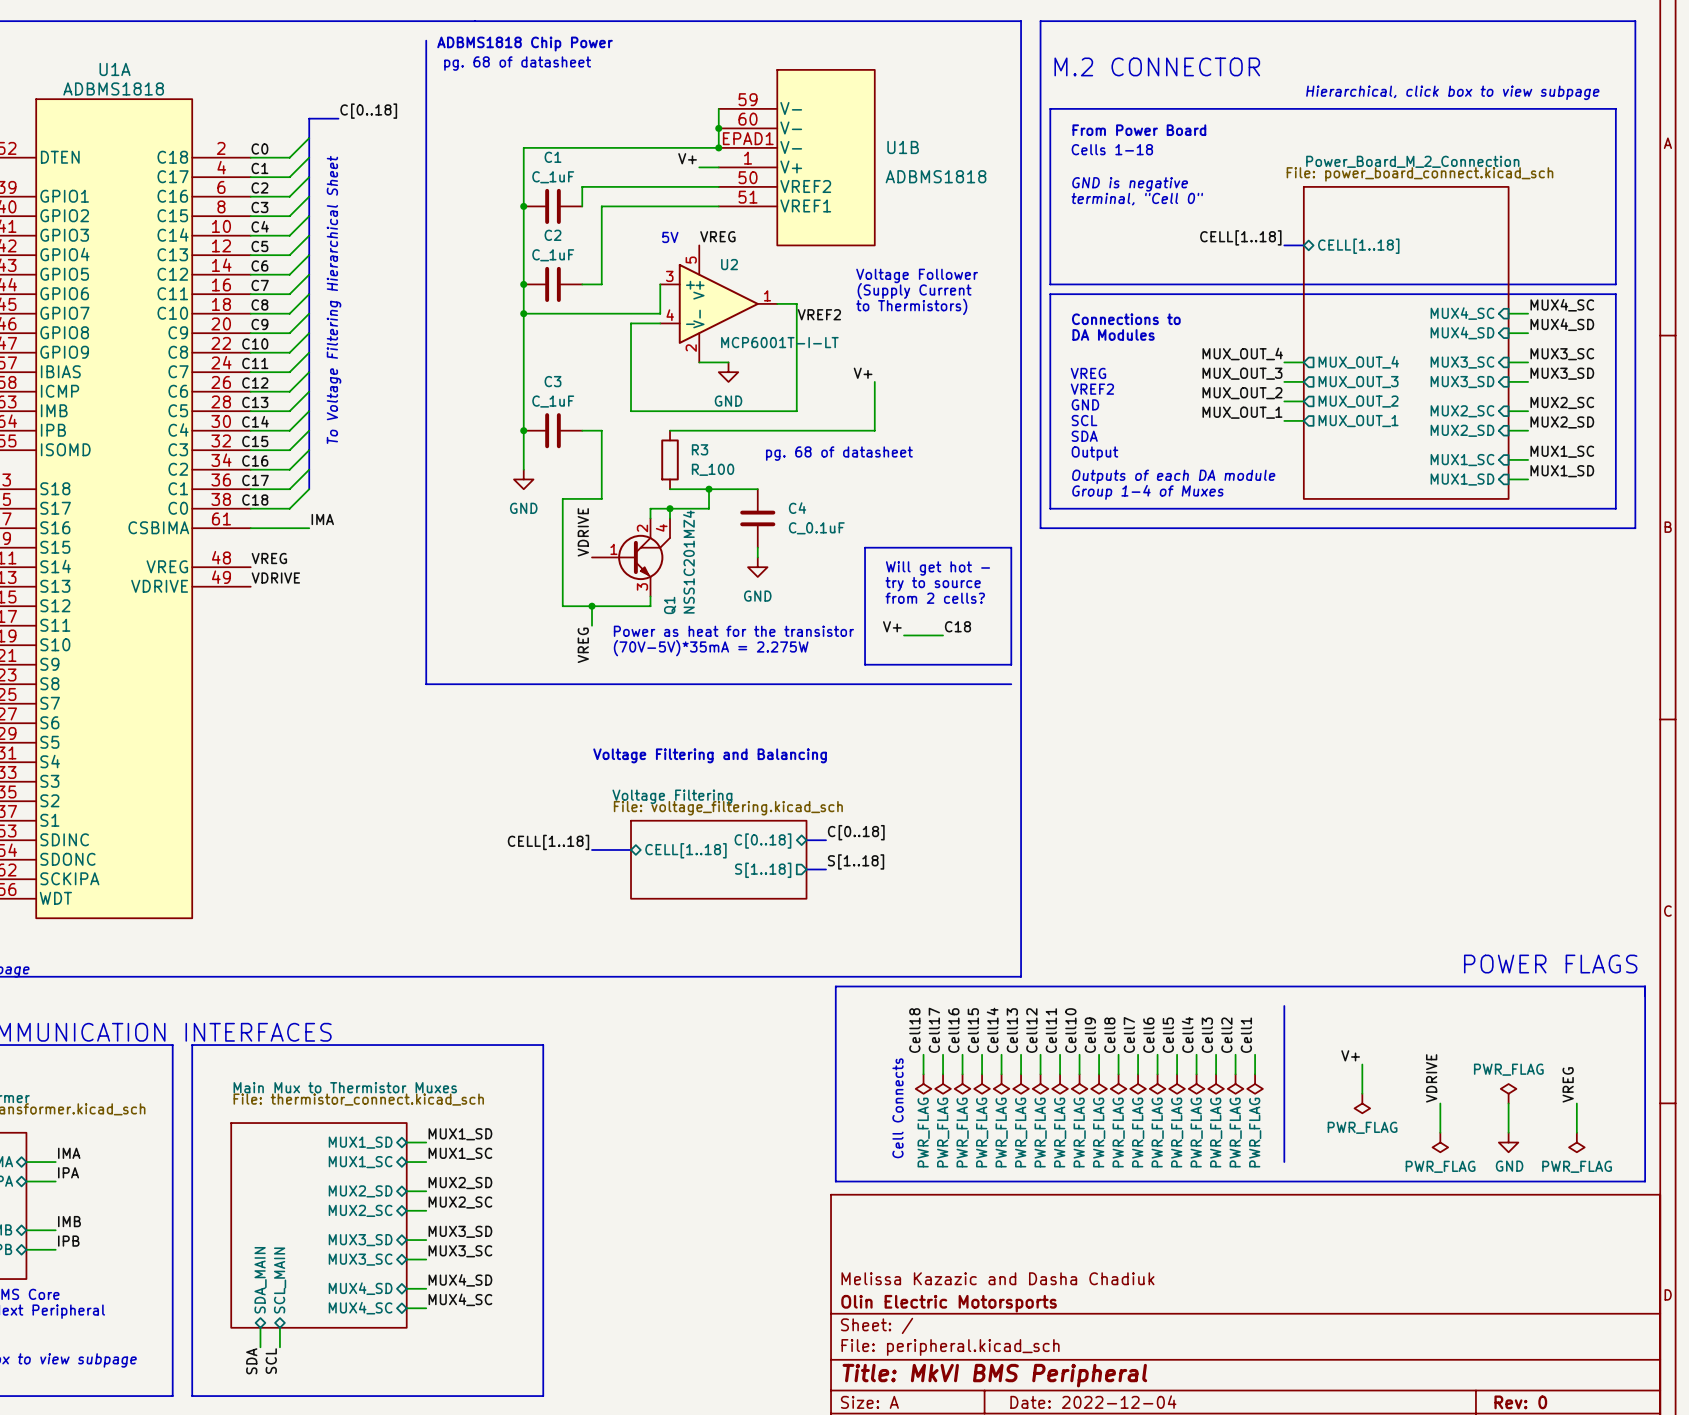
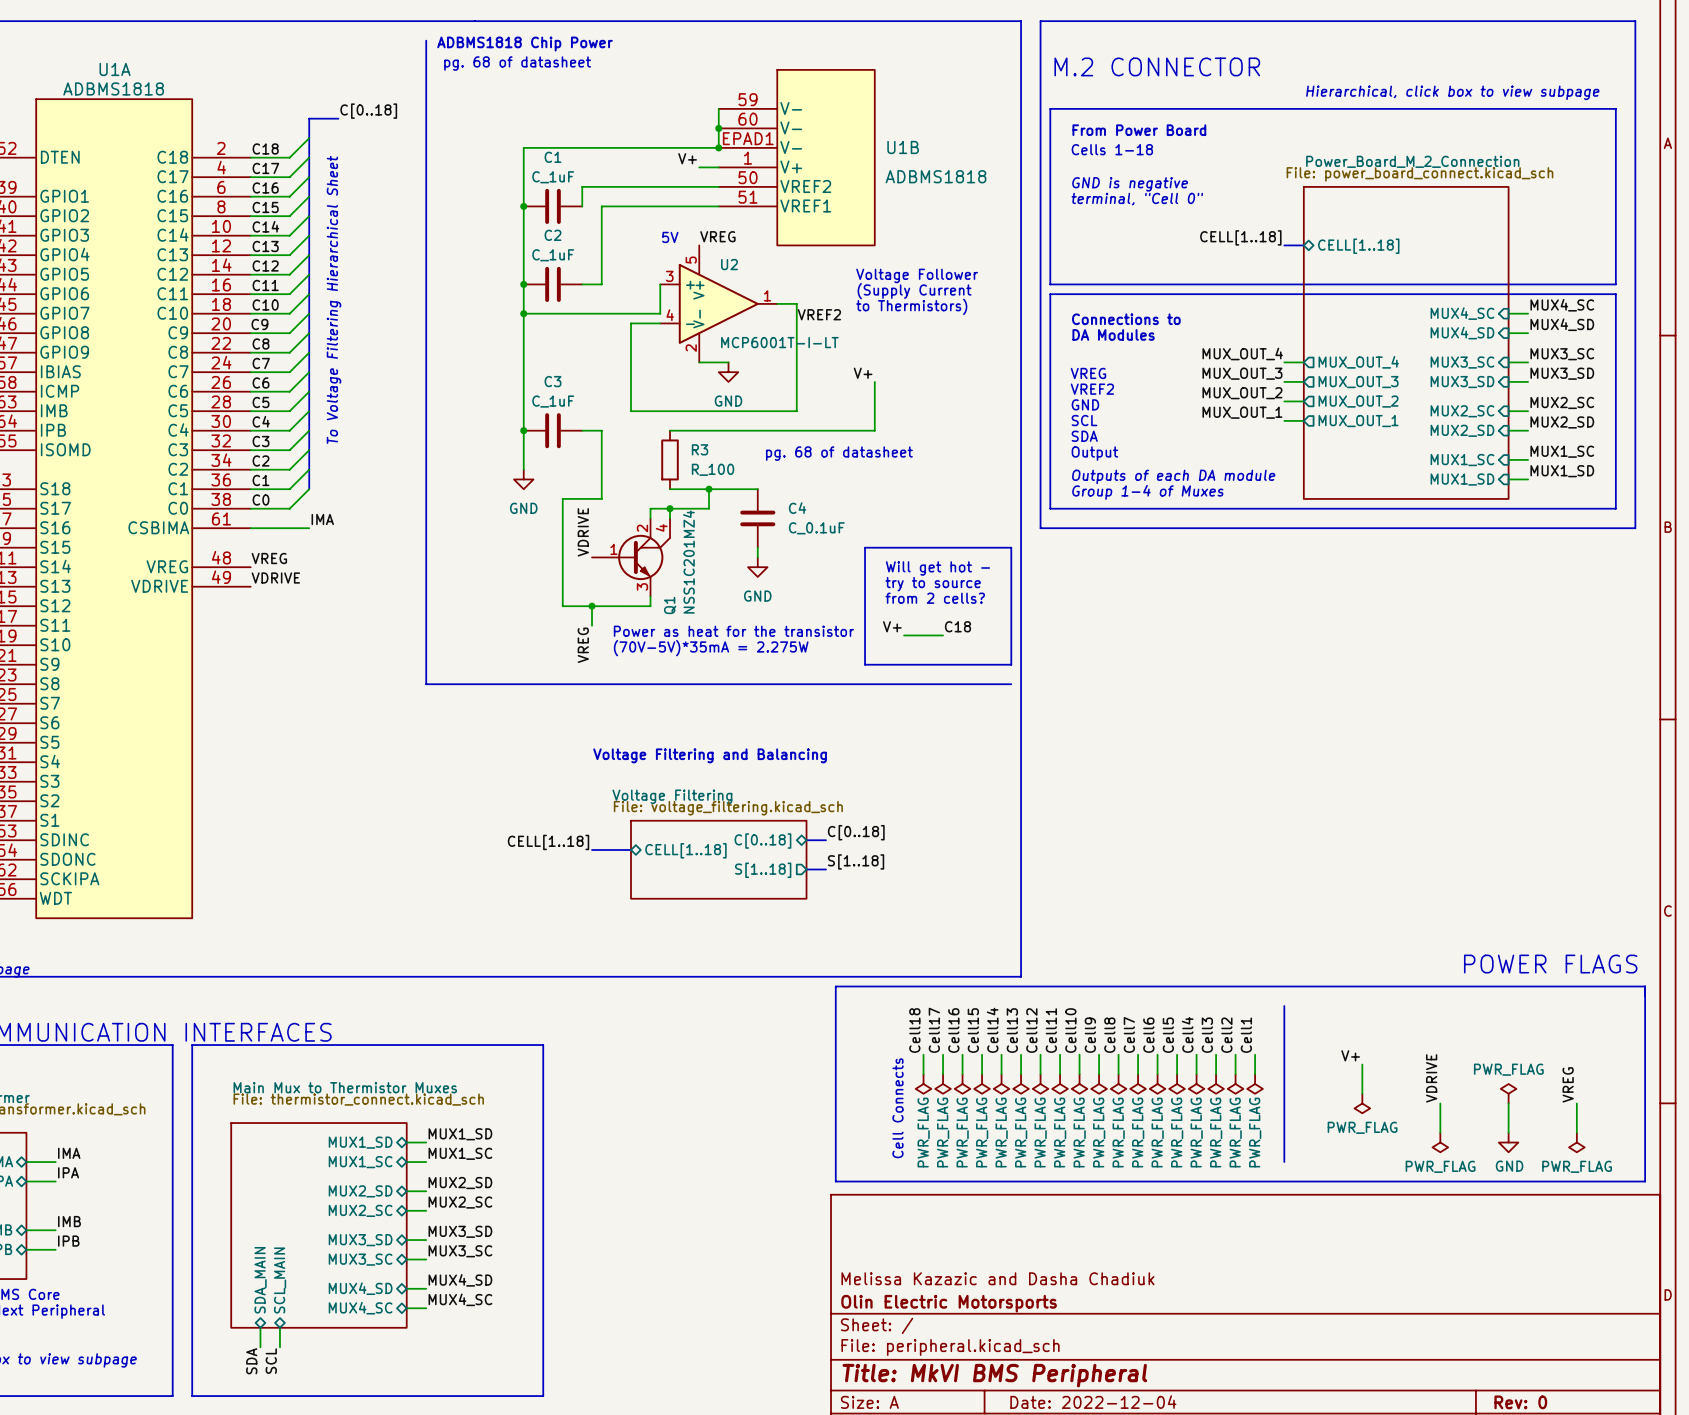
label: C0 (259, 148) -> none
label: none -> C18 (265, 148)
label: C1 (259, 168) -> none
label: none -> C17 (265, 168)
label: C2 (259, 187) -> none
label: none -> C16 (265, 187)
label: C3 (259, 207) -> none
label: none -> C15 (265, 207)
label: C4 (260, 226) -> C14 (265, 226)
label position: C5 (259, 246) -> C5 (261, 402)
label position: C6 (259, 265) -> C6 (261, 382)
label position: C7 (260, 285) -> C7 (261, 363)
label position: C8 (259, 304) -> C8 (261, 343)
label position: C10 (255, 343) -> C10 (265, 304)
label position: C11 (255, 363) -> C11 (265, 285)
label position: C12 (255, 382) -> C12 (265, 265)
label position: C13 (255, 402) -> C13 (265, 246)
label: C14 (255, 421) -> C4 (261, 421)
label: C15 (255, 441) -> none
label: none -> C3 (261, 441)
label: C16 (255, 461) -> none
label: none -> C2 (261, 461)
label: C17 (255, 480) -> none
label: none -> C1 (261, 480)
label: C18 (255, 500) -> none
label: none -> C0 (261, 500)

